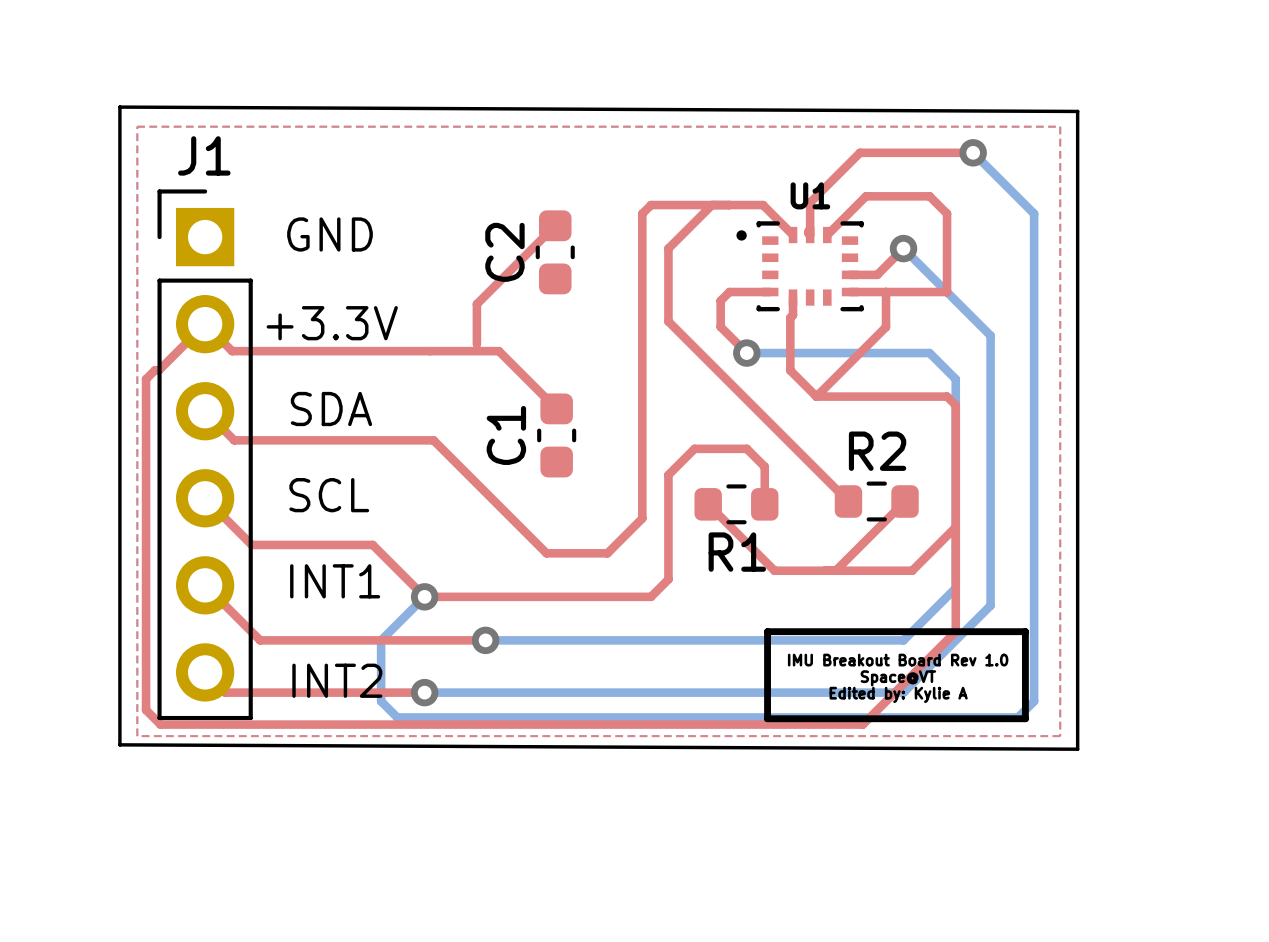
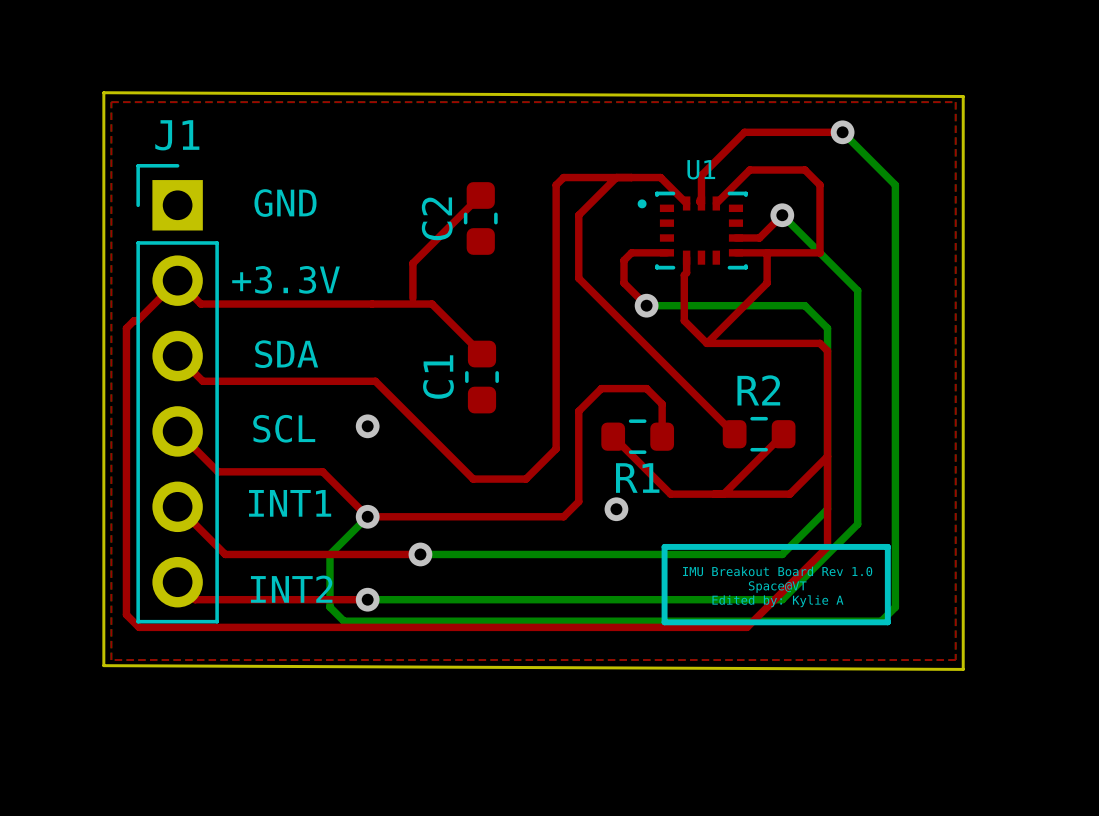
board edge: (119, 107) (1077, 111) (1077, 749) (119, 744) -> (103, 92) (963, 96) (963, 669) (103, 665) (103, 644)
top zone outline: (137, 126) (137, 736) (1060, 736) (1060, 126) (137, 126) -> (111, 102) (111, 660) (955, 660) (955, 102) (111, 102)
via: none -> (367, 426)
via: none -> (616, 509)

